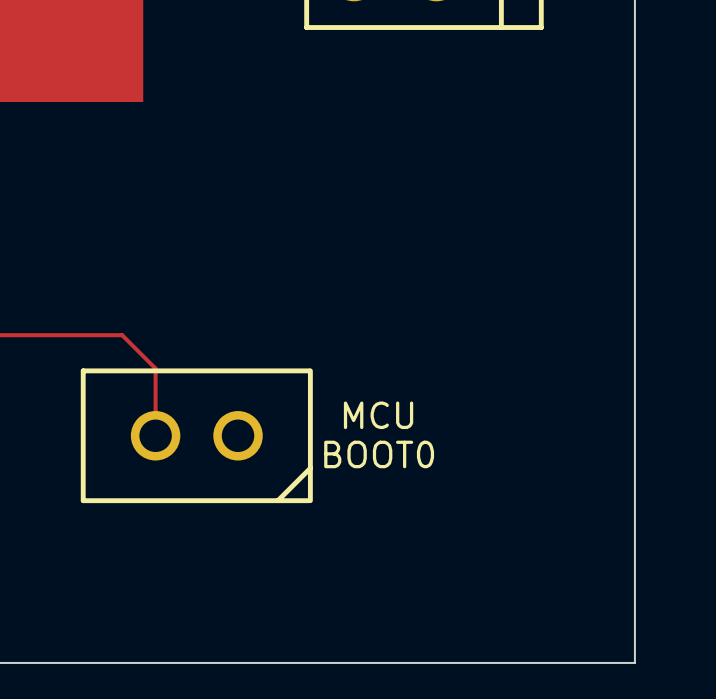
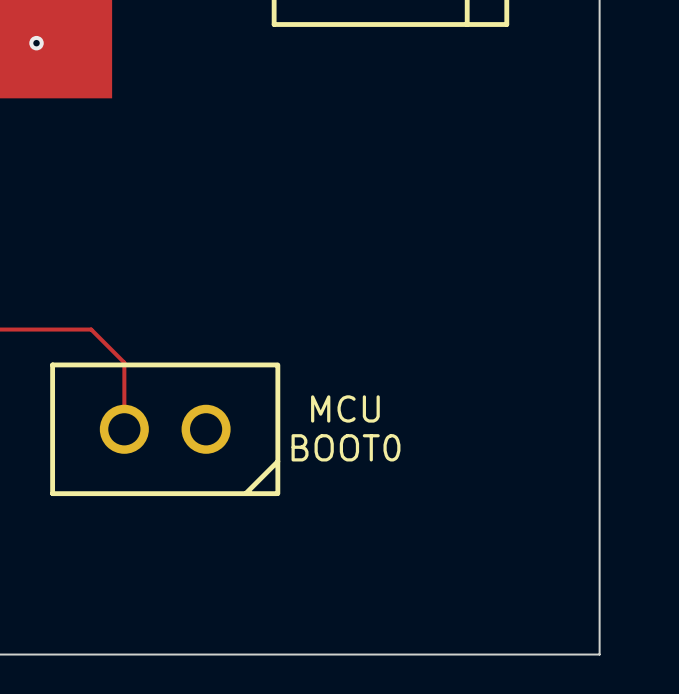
via: none -> (36, 43)

